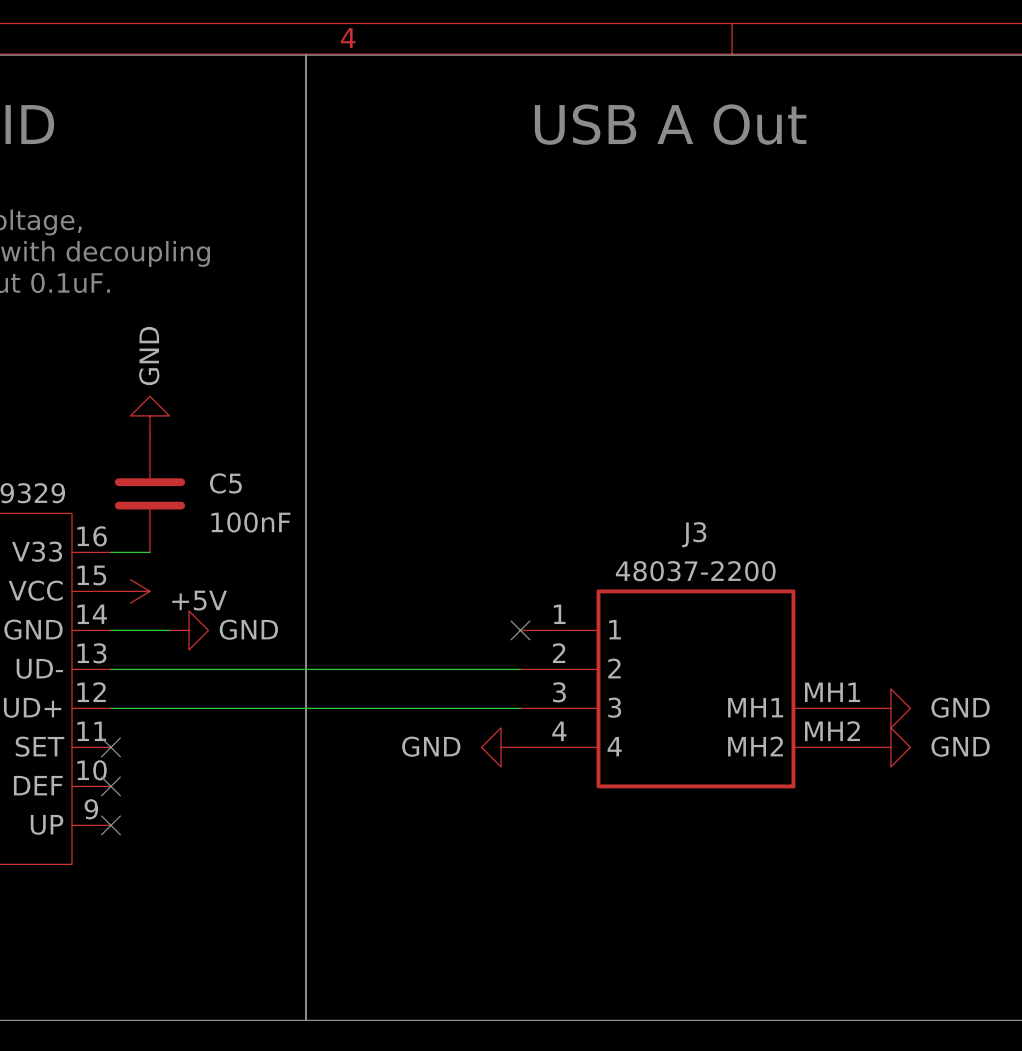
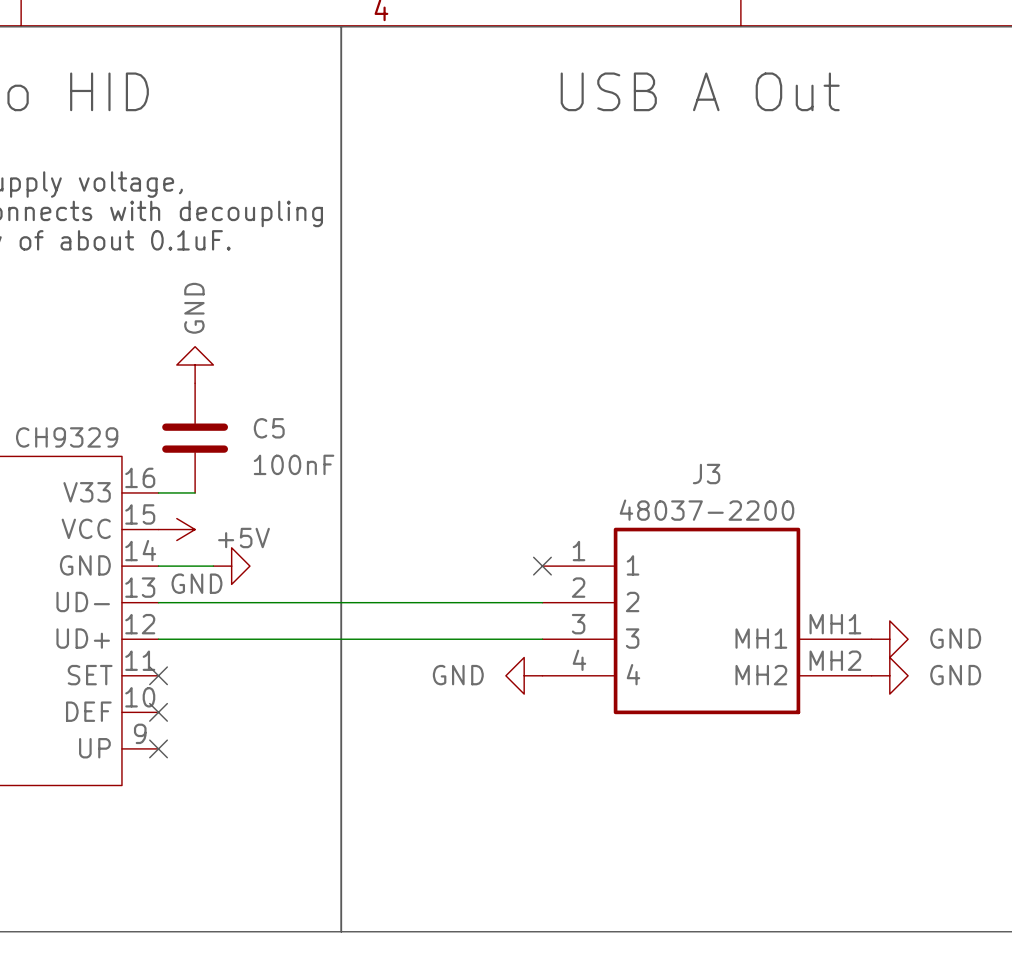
power symbol text position: GND (248, 629) -> GND (196, 583)

